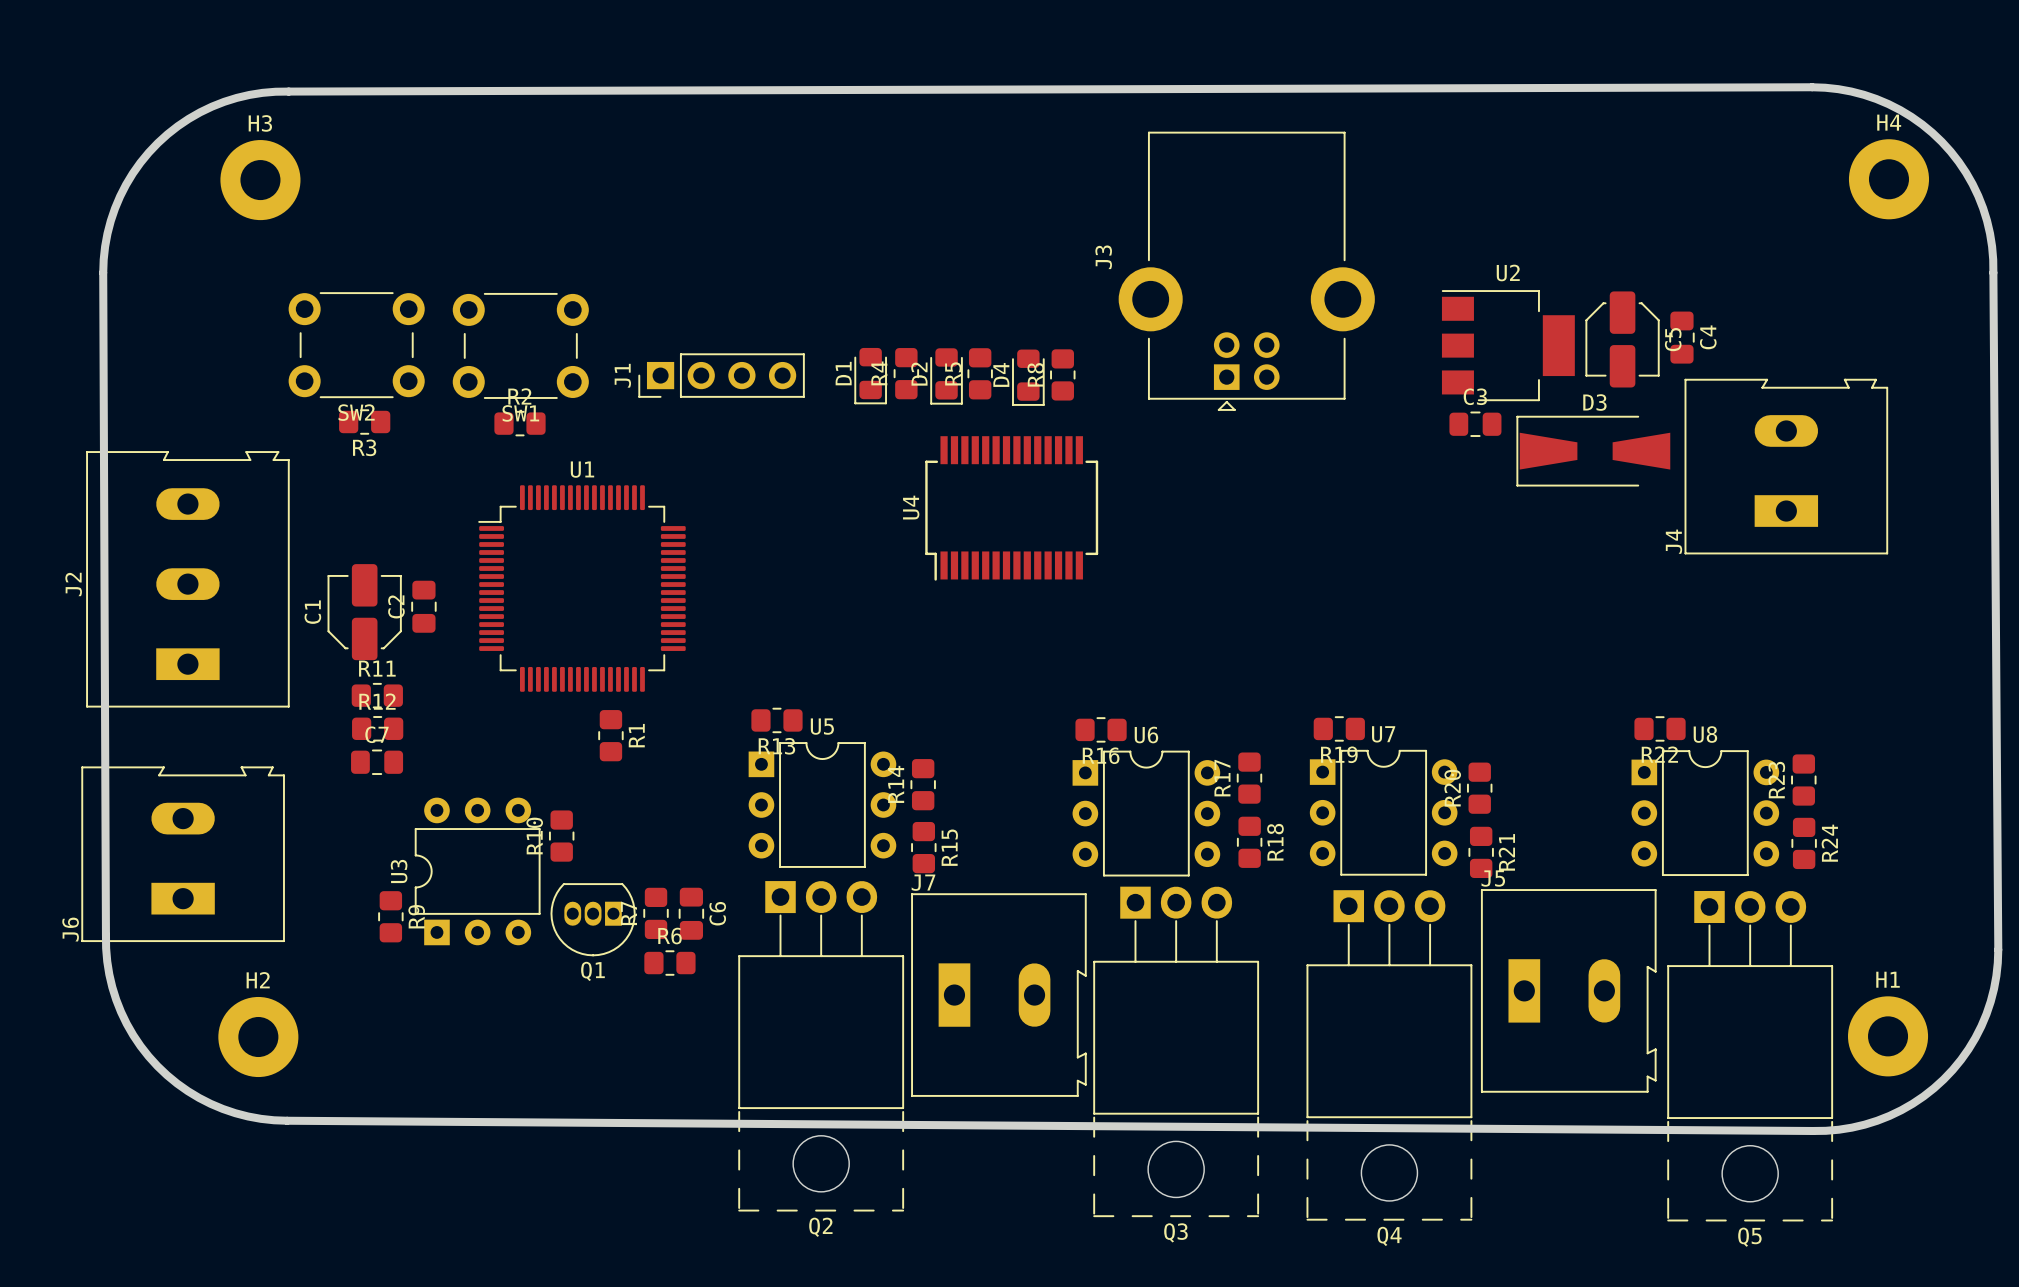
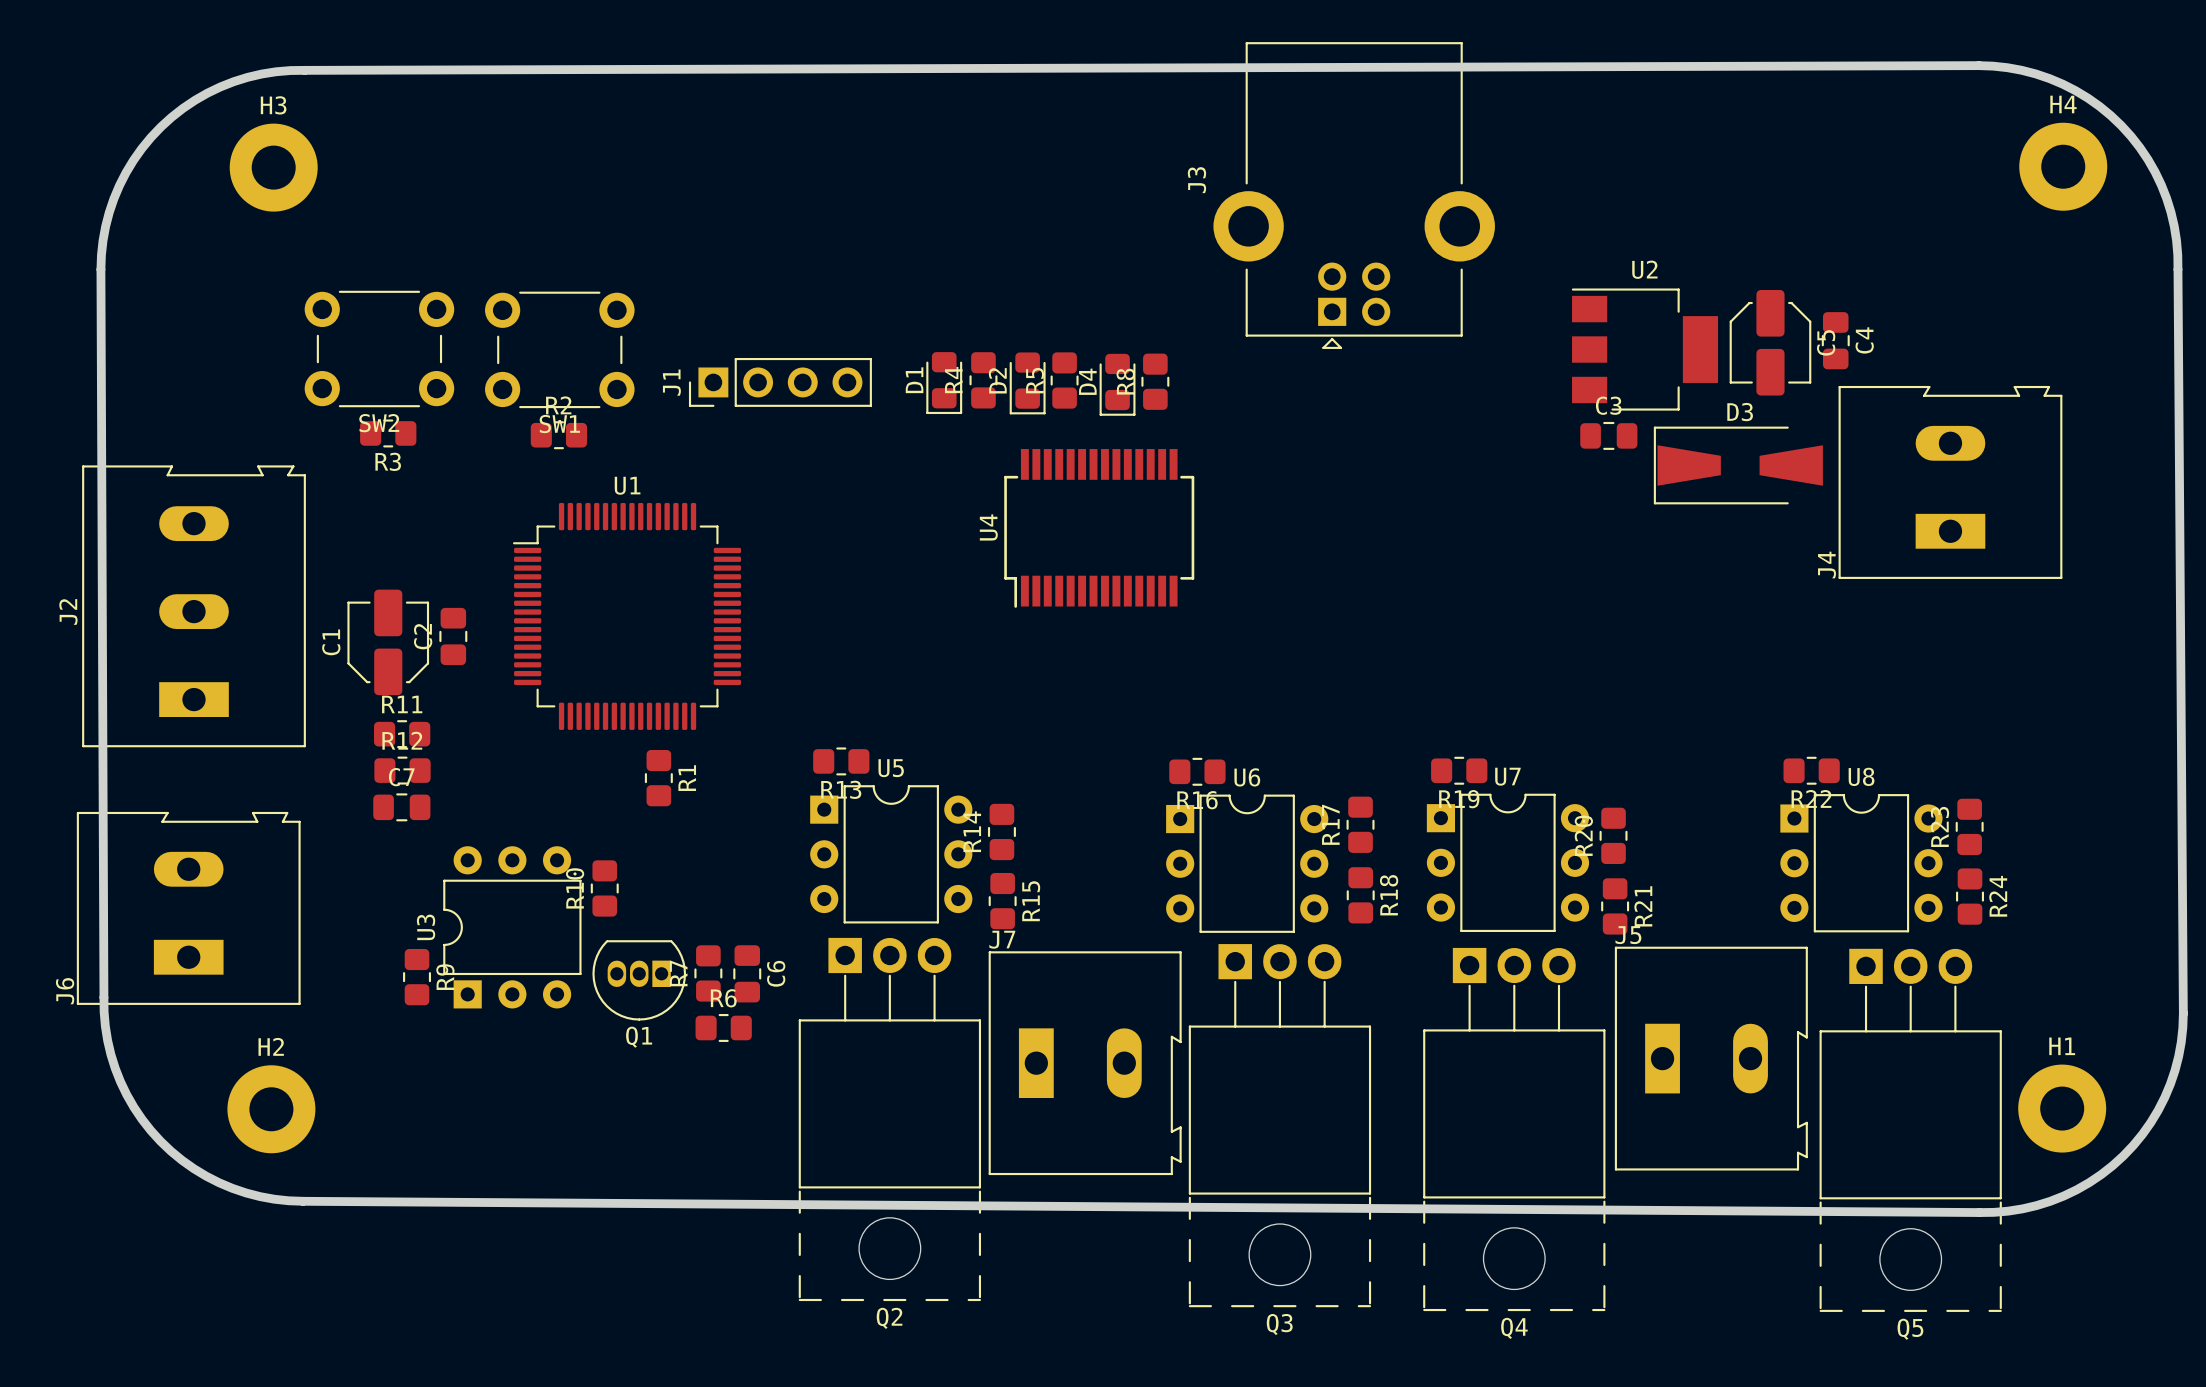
J3 position: (1246, 271) -> (1354, 195)

